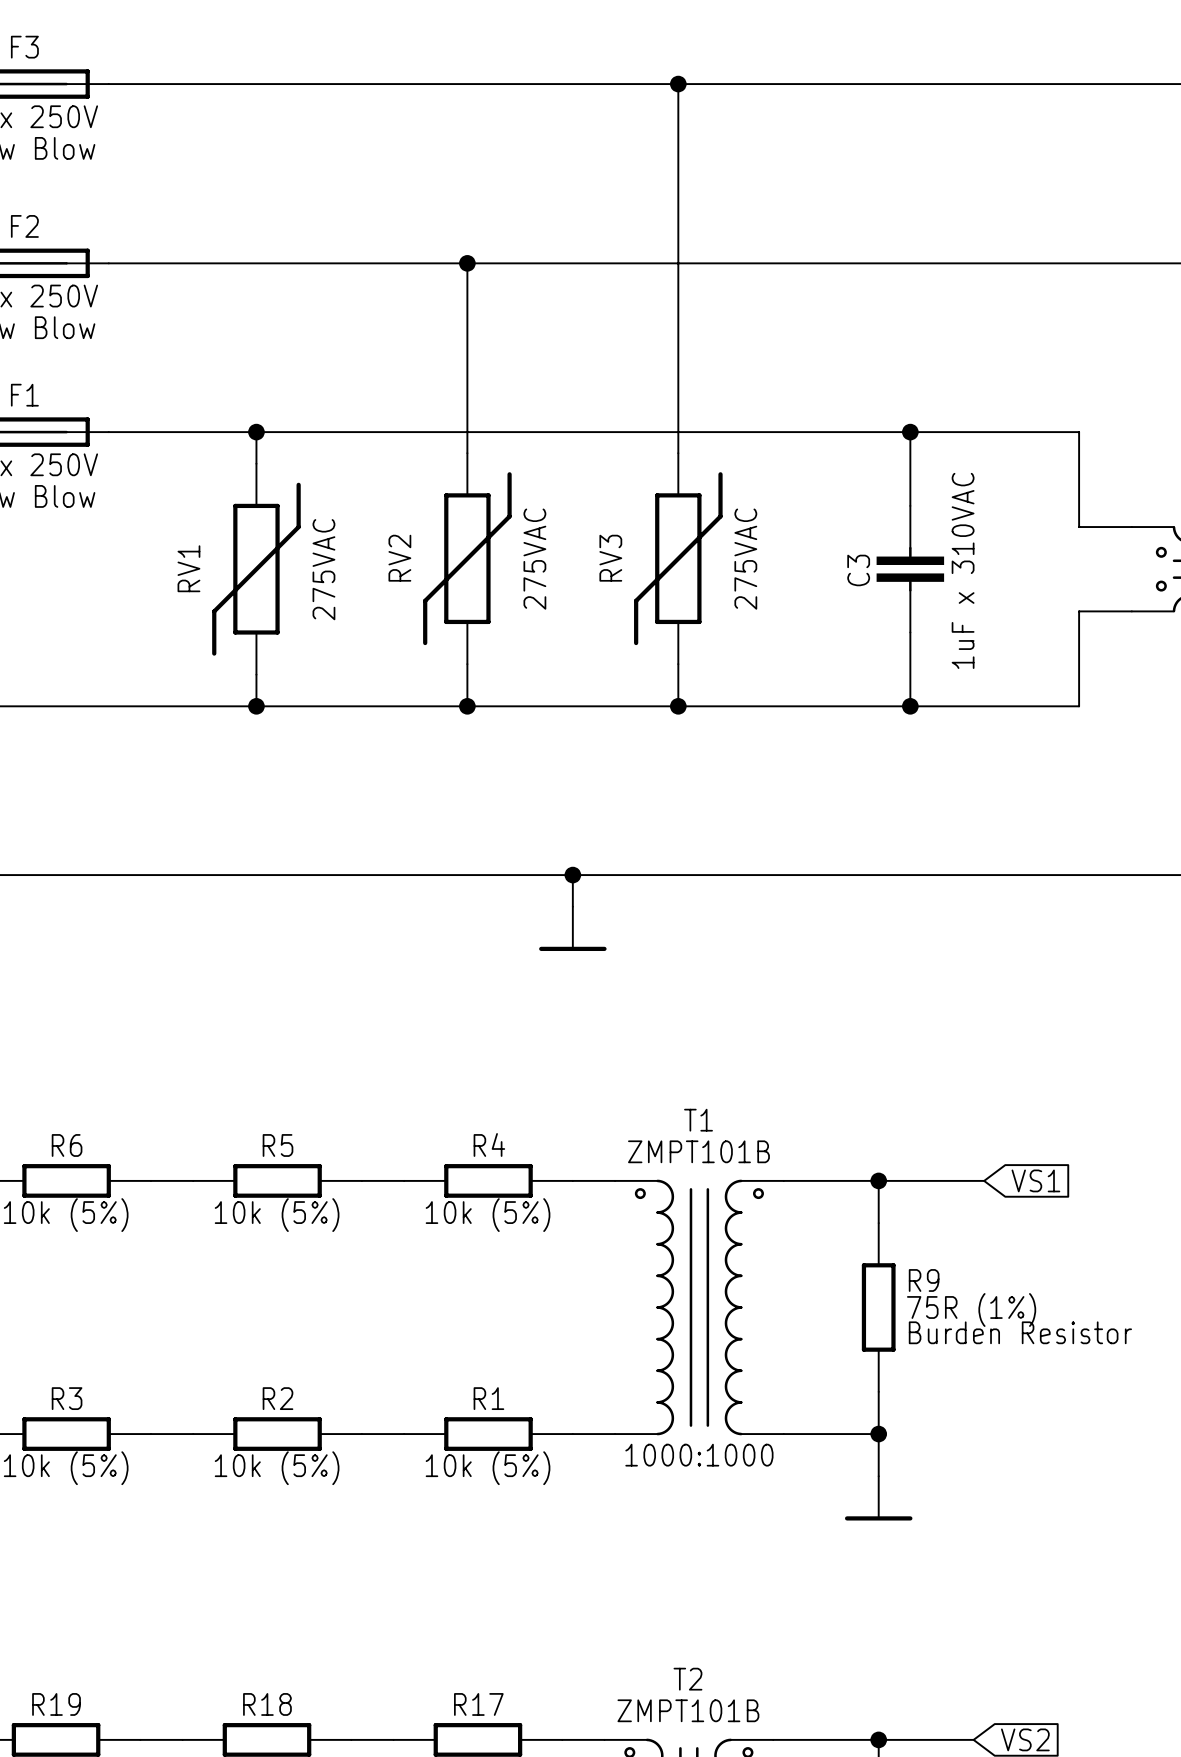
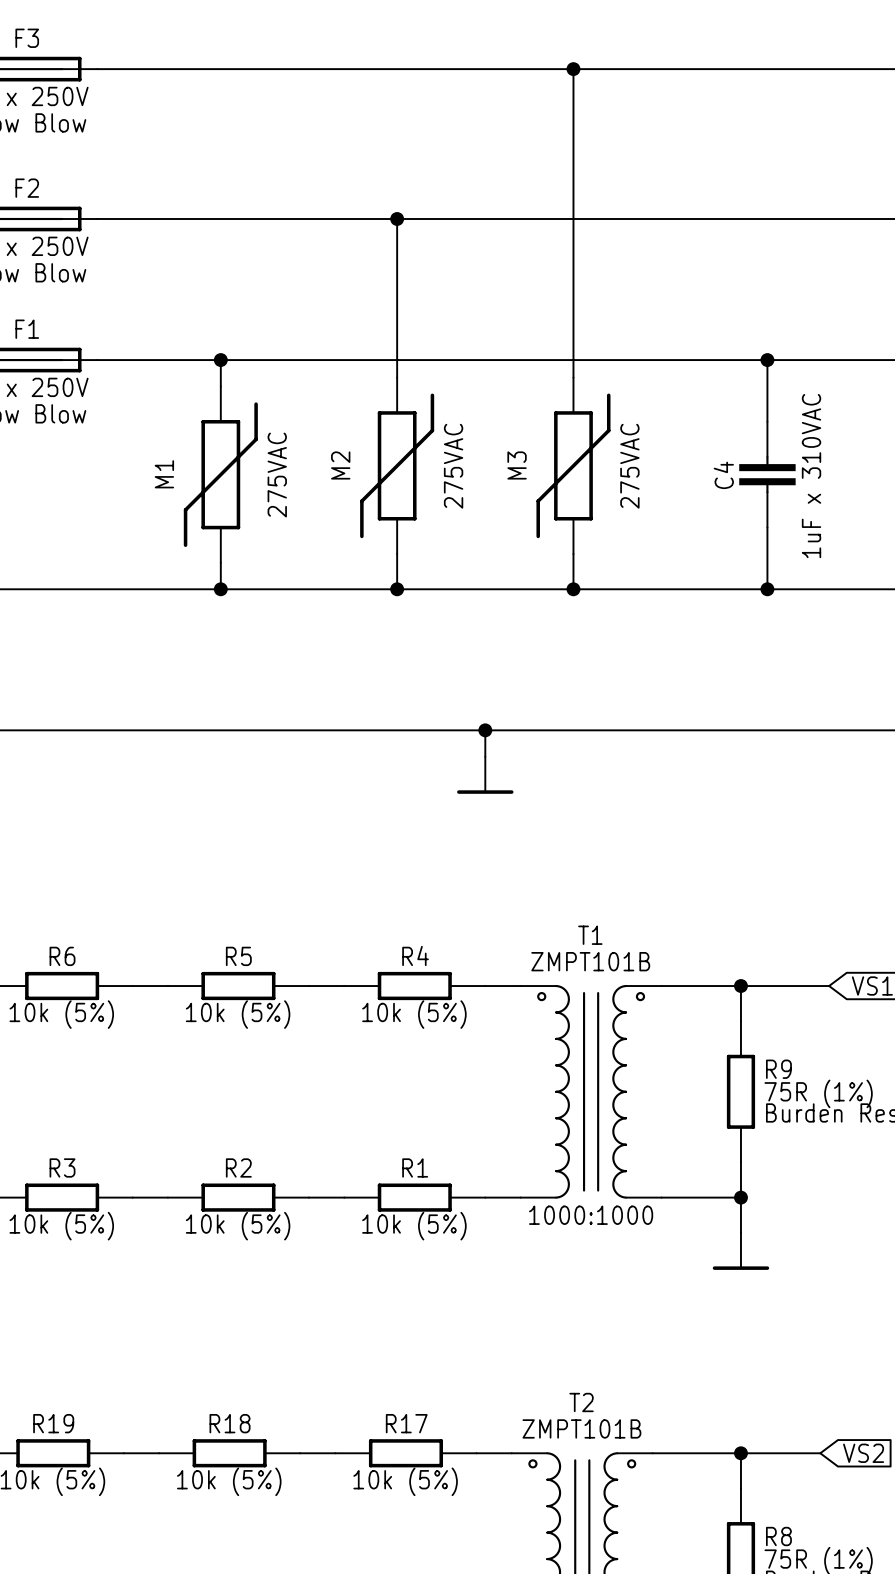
RV2 name: RV2 (399, 558) -> M2 (340, 465)
RV3 name: RV3 (610, 558) -> M3 (517, 465)
RV1 name: RV1 (188, 568) -> M1 (164, 474)
C3 name: C3 (858, 570) -> C4 (723, 475)

